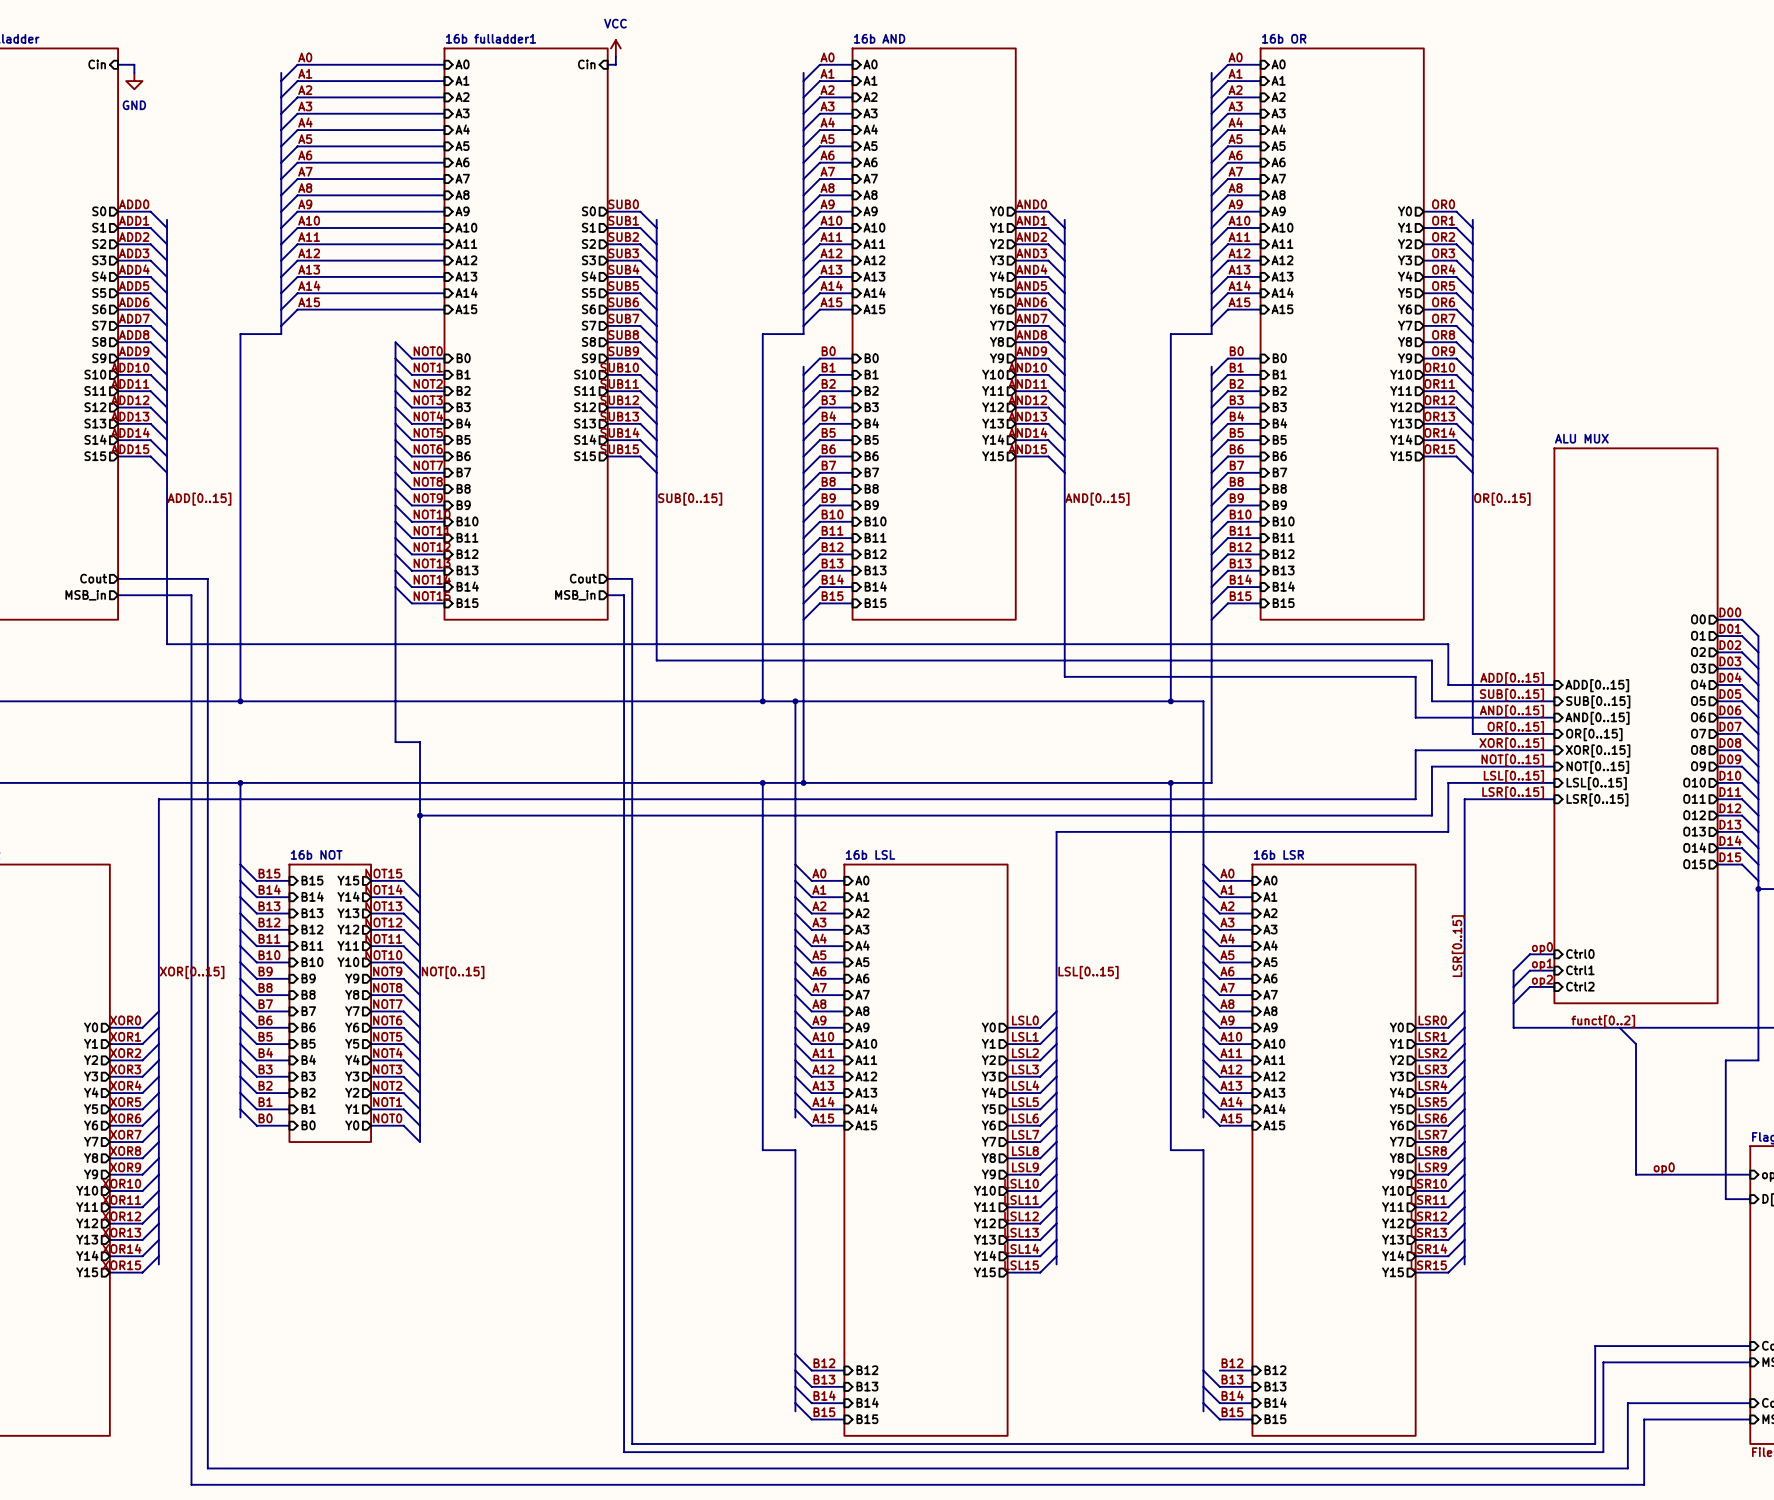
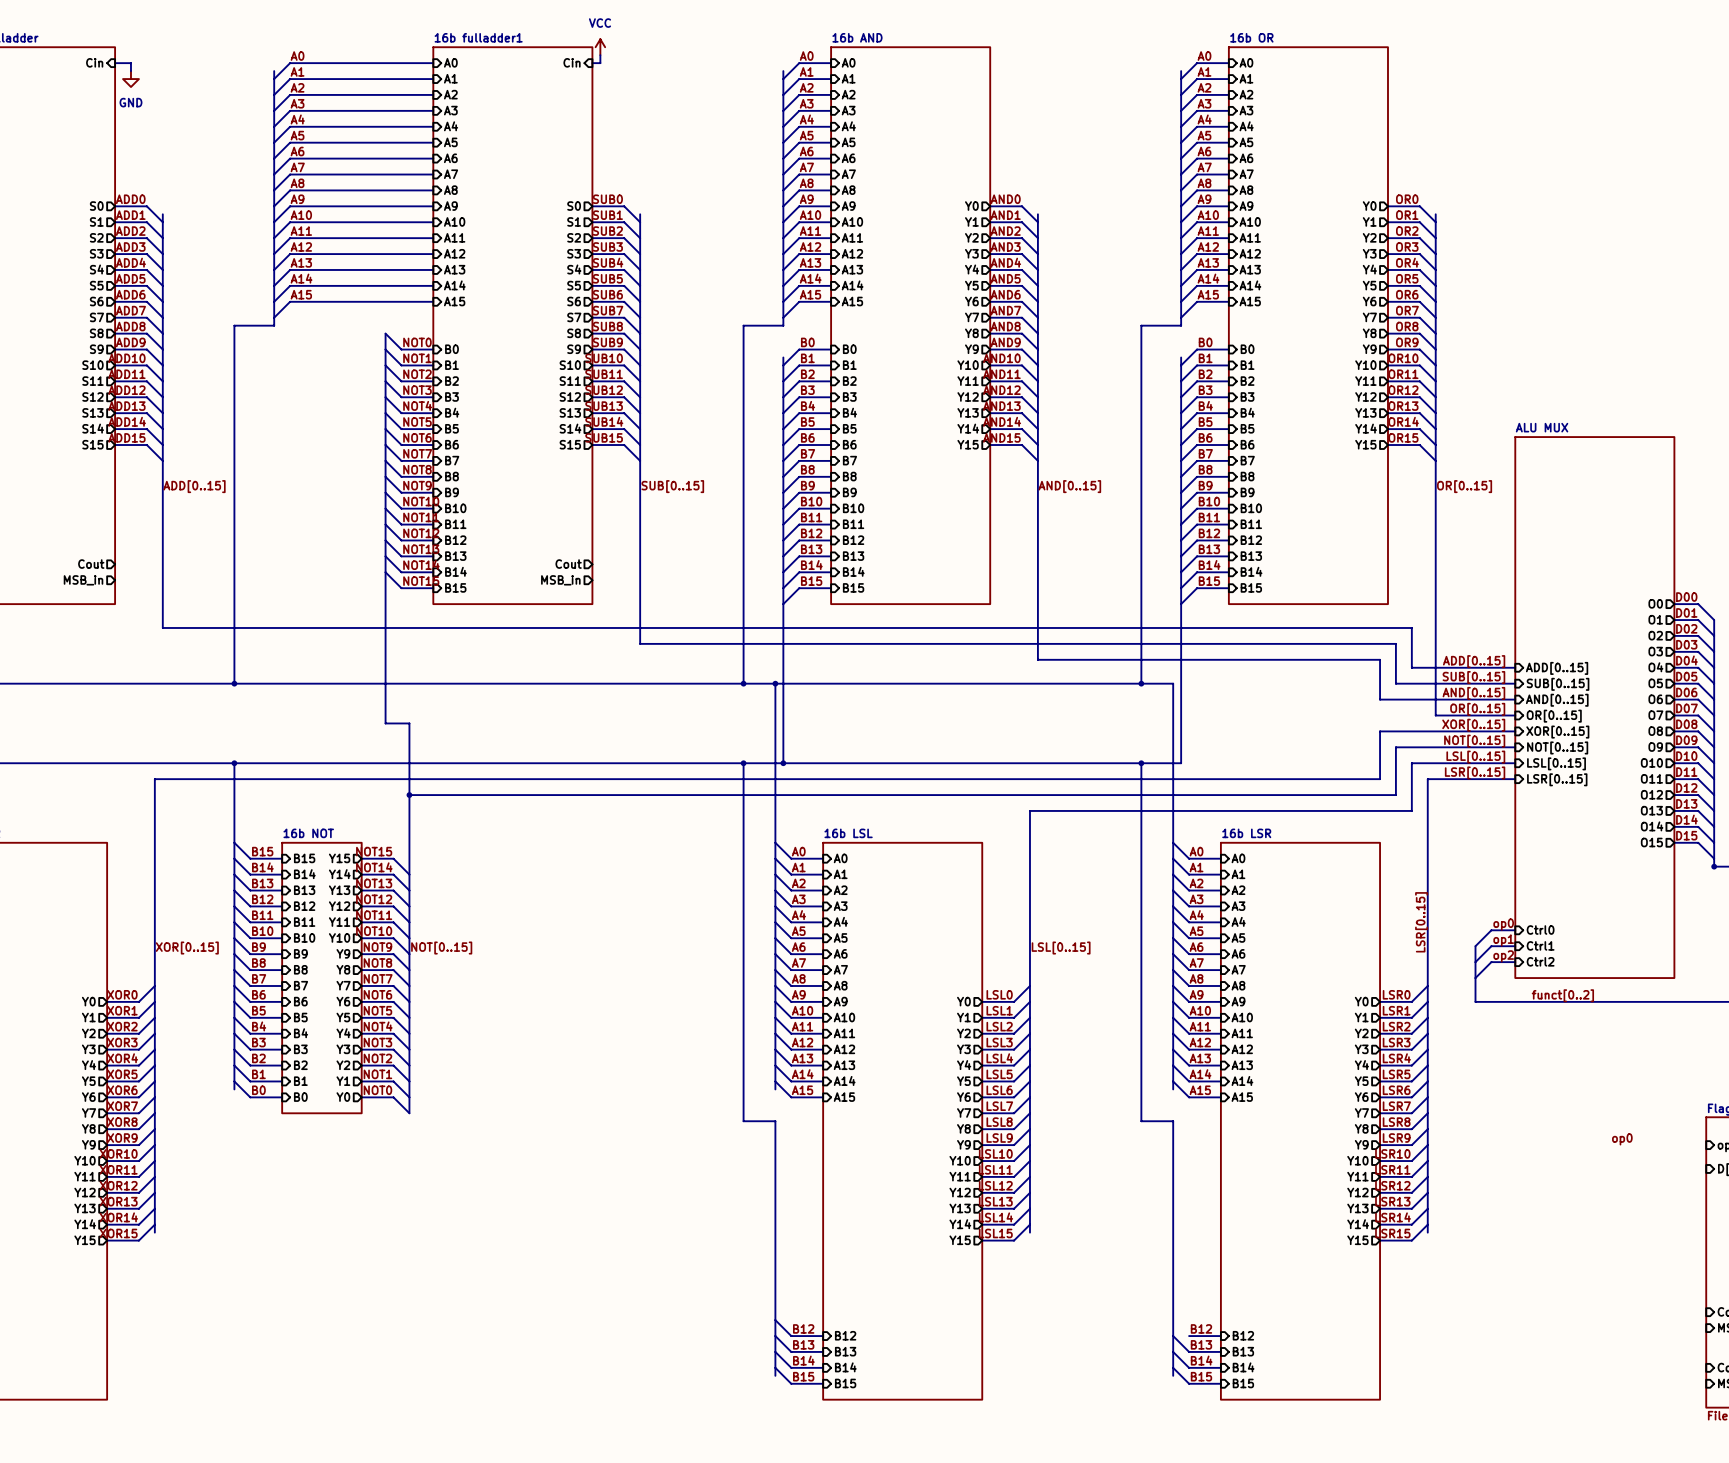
wire: (118, 578) (207, 578) (207, 1468) (1627, 1468) (1627, 1403) (1750, 1403) -> none
wire: (607, 578) (632, 578) (632, 1443) (1595, 1443) (1595, 1346) (1750, 1346) -> none
wire: (118, 595) (191, 595) (191, 1484) (1644, 1484) (1644, 1419) (1750, 1419) -> none
wire: (607, 595) (624, 595) (624, 1452) (1603, 1452) (1603, 1362) (1750, 1362) -> none
bus: (1758, 889) (1758, 1060) (1725, 1060) (1725, 1199) (1750, 1199) -> none
wire: (1619, 1027) (1636, 1044) (1636, 1174) (1750, 1174) -> none

